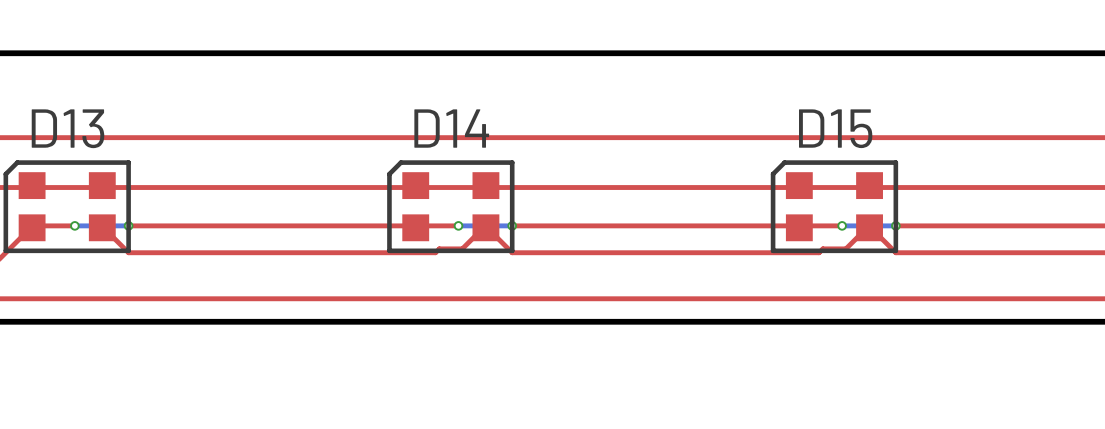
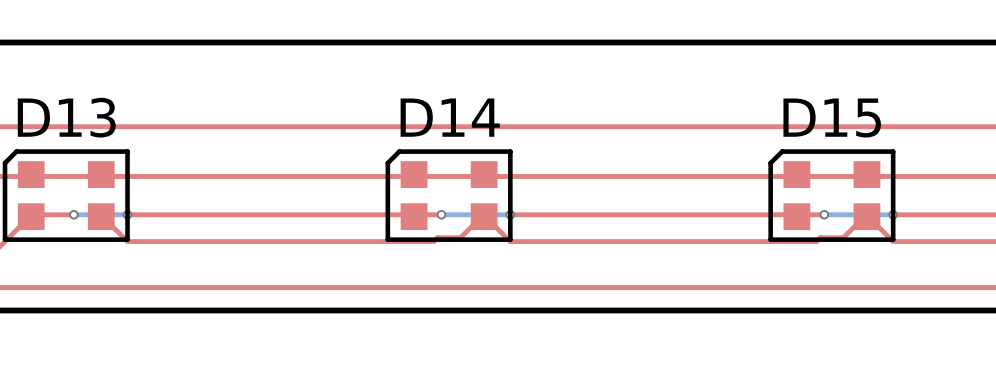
top track: (443, 225) (458, 225) -> none
bottom track: none -> (441, 214) (456, 214)
via position: (458, 225) -> (441, 214)
top track: (826, 225) (842, 225) -> none
bottom track: none -> (824, 214) (839, 214)
via position: (842, 225) -> (824, 214)

